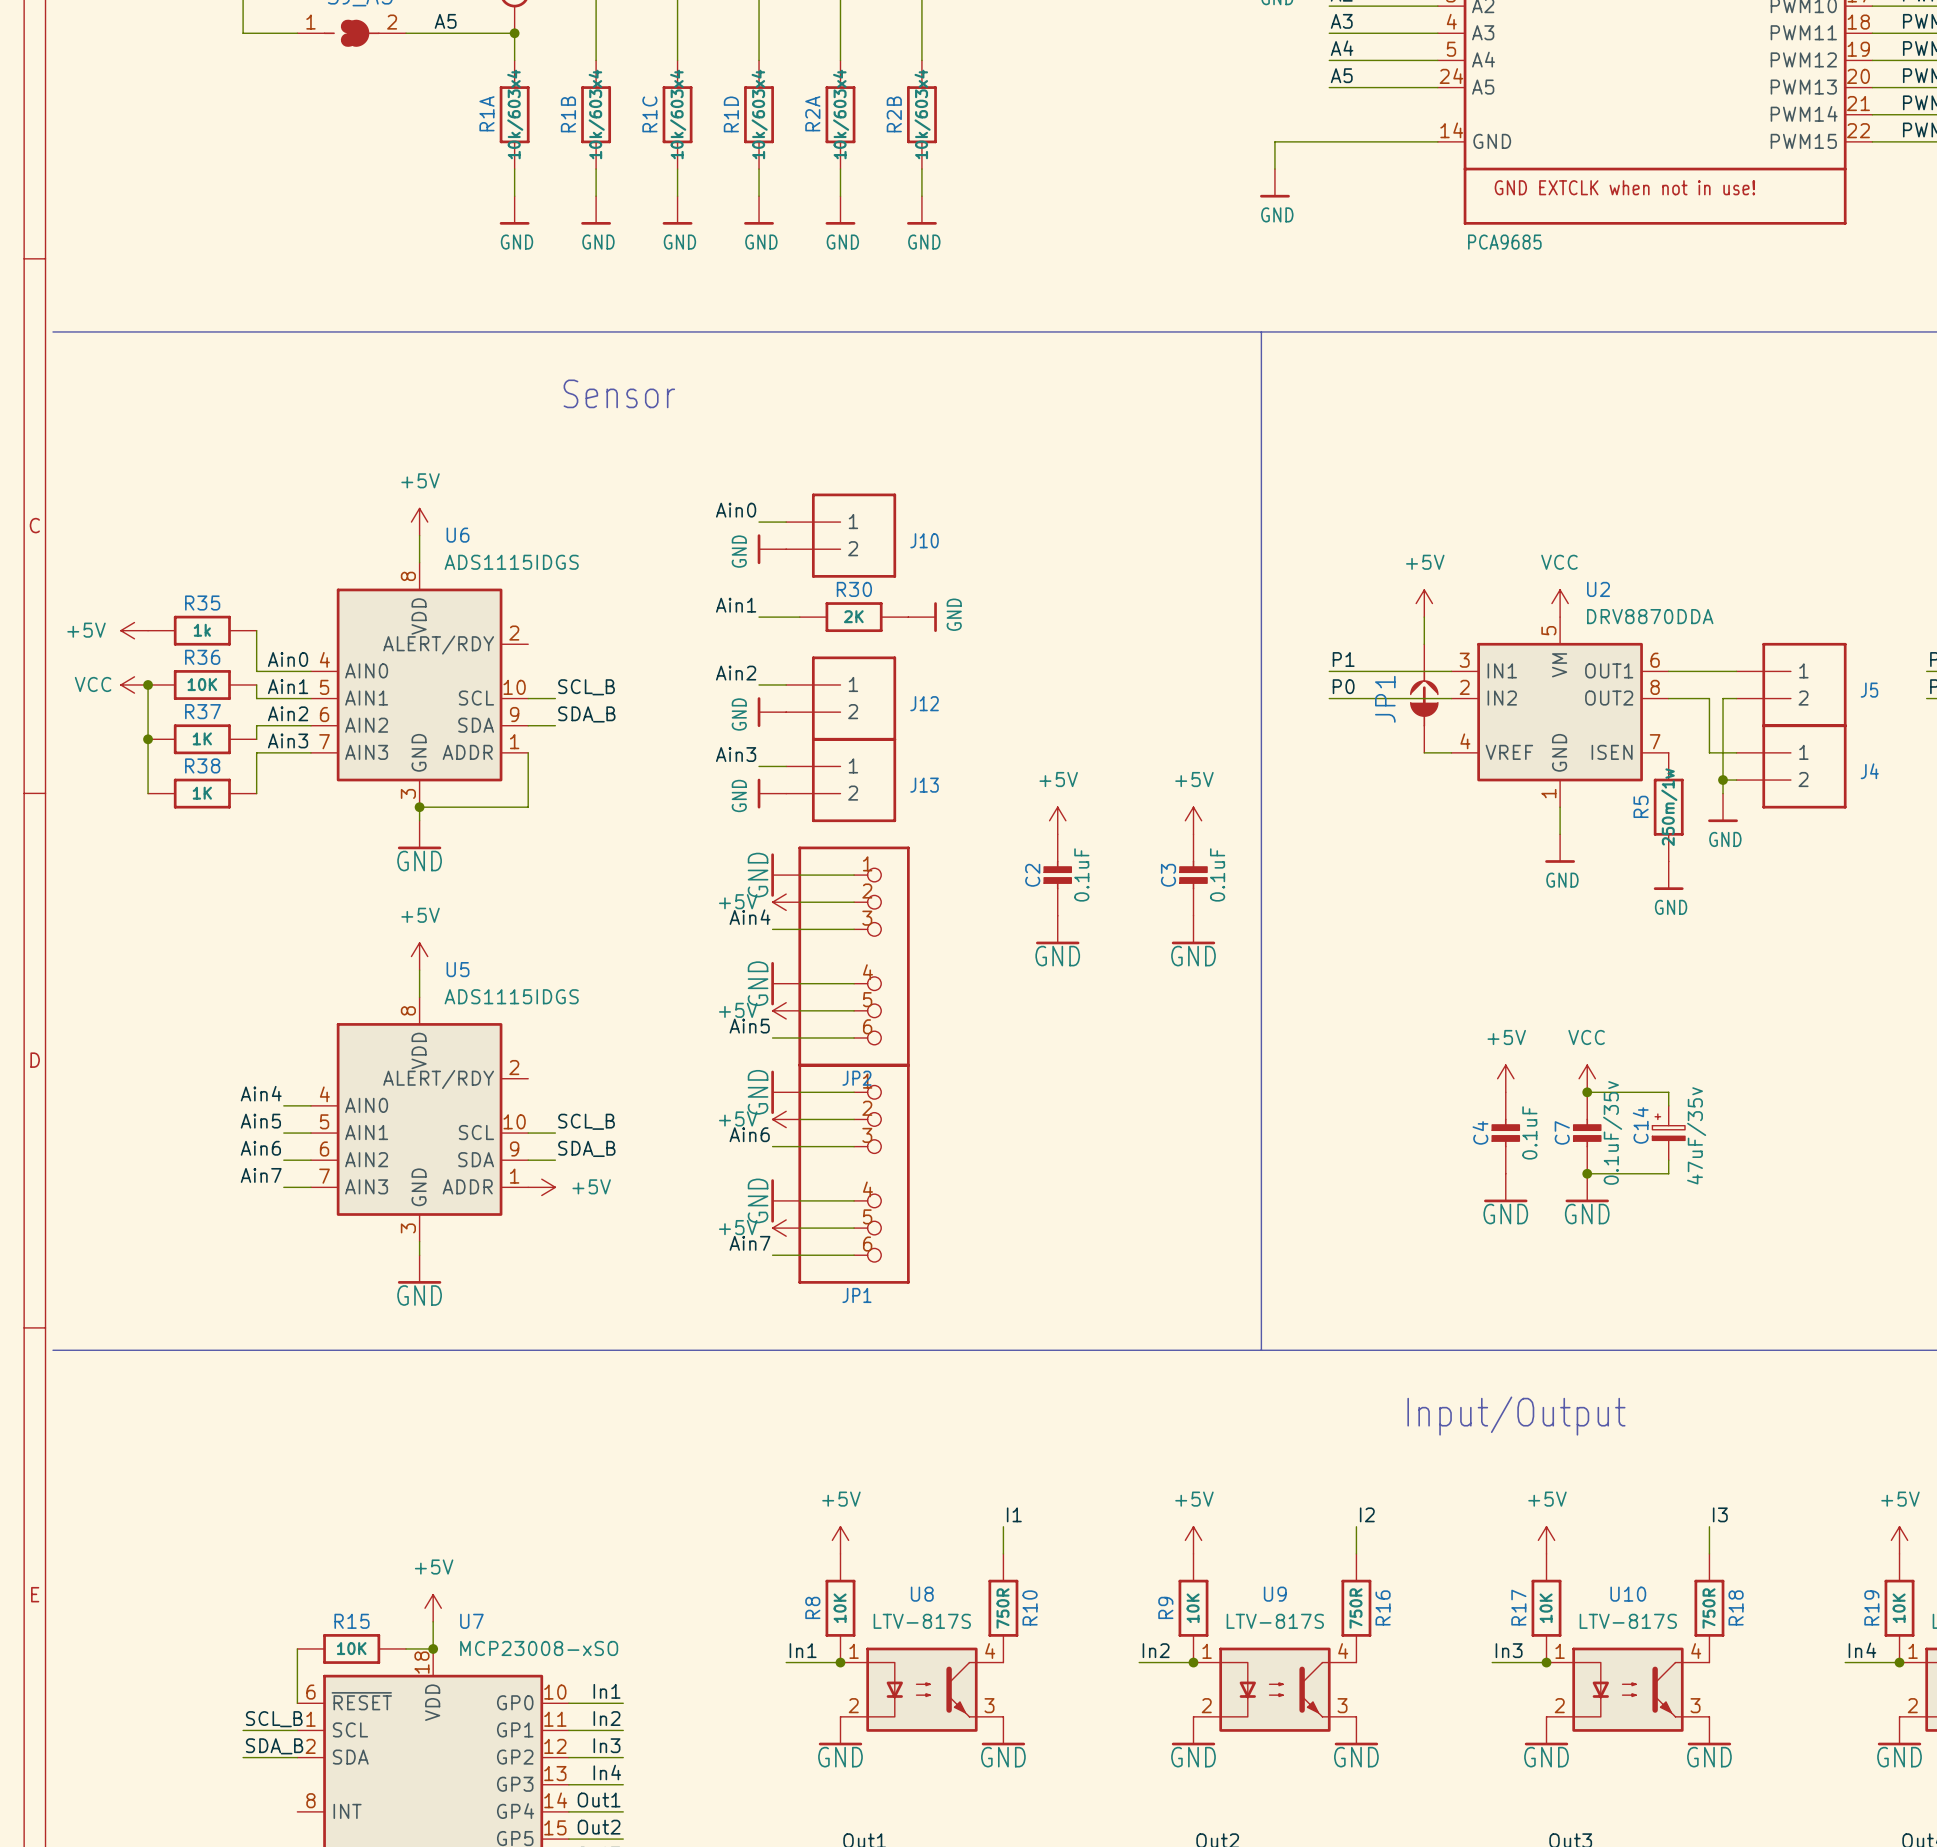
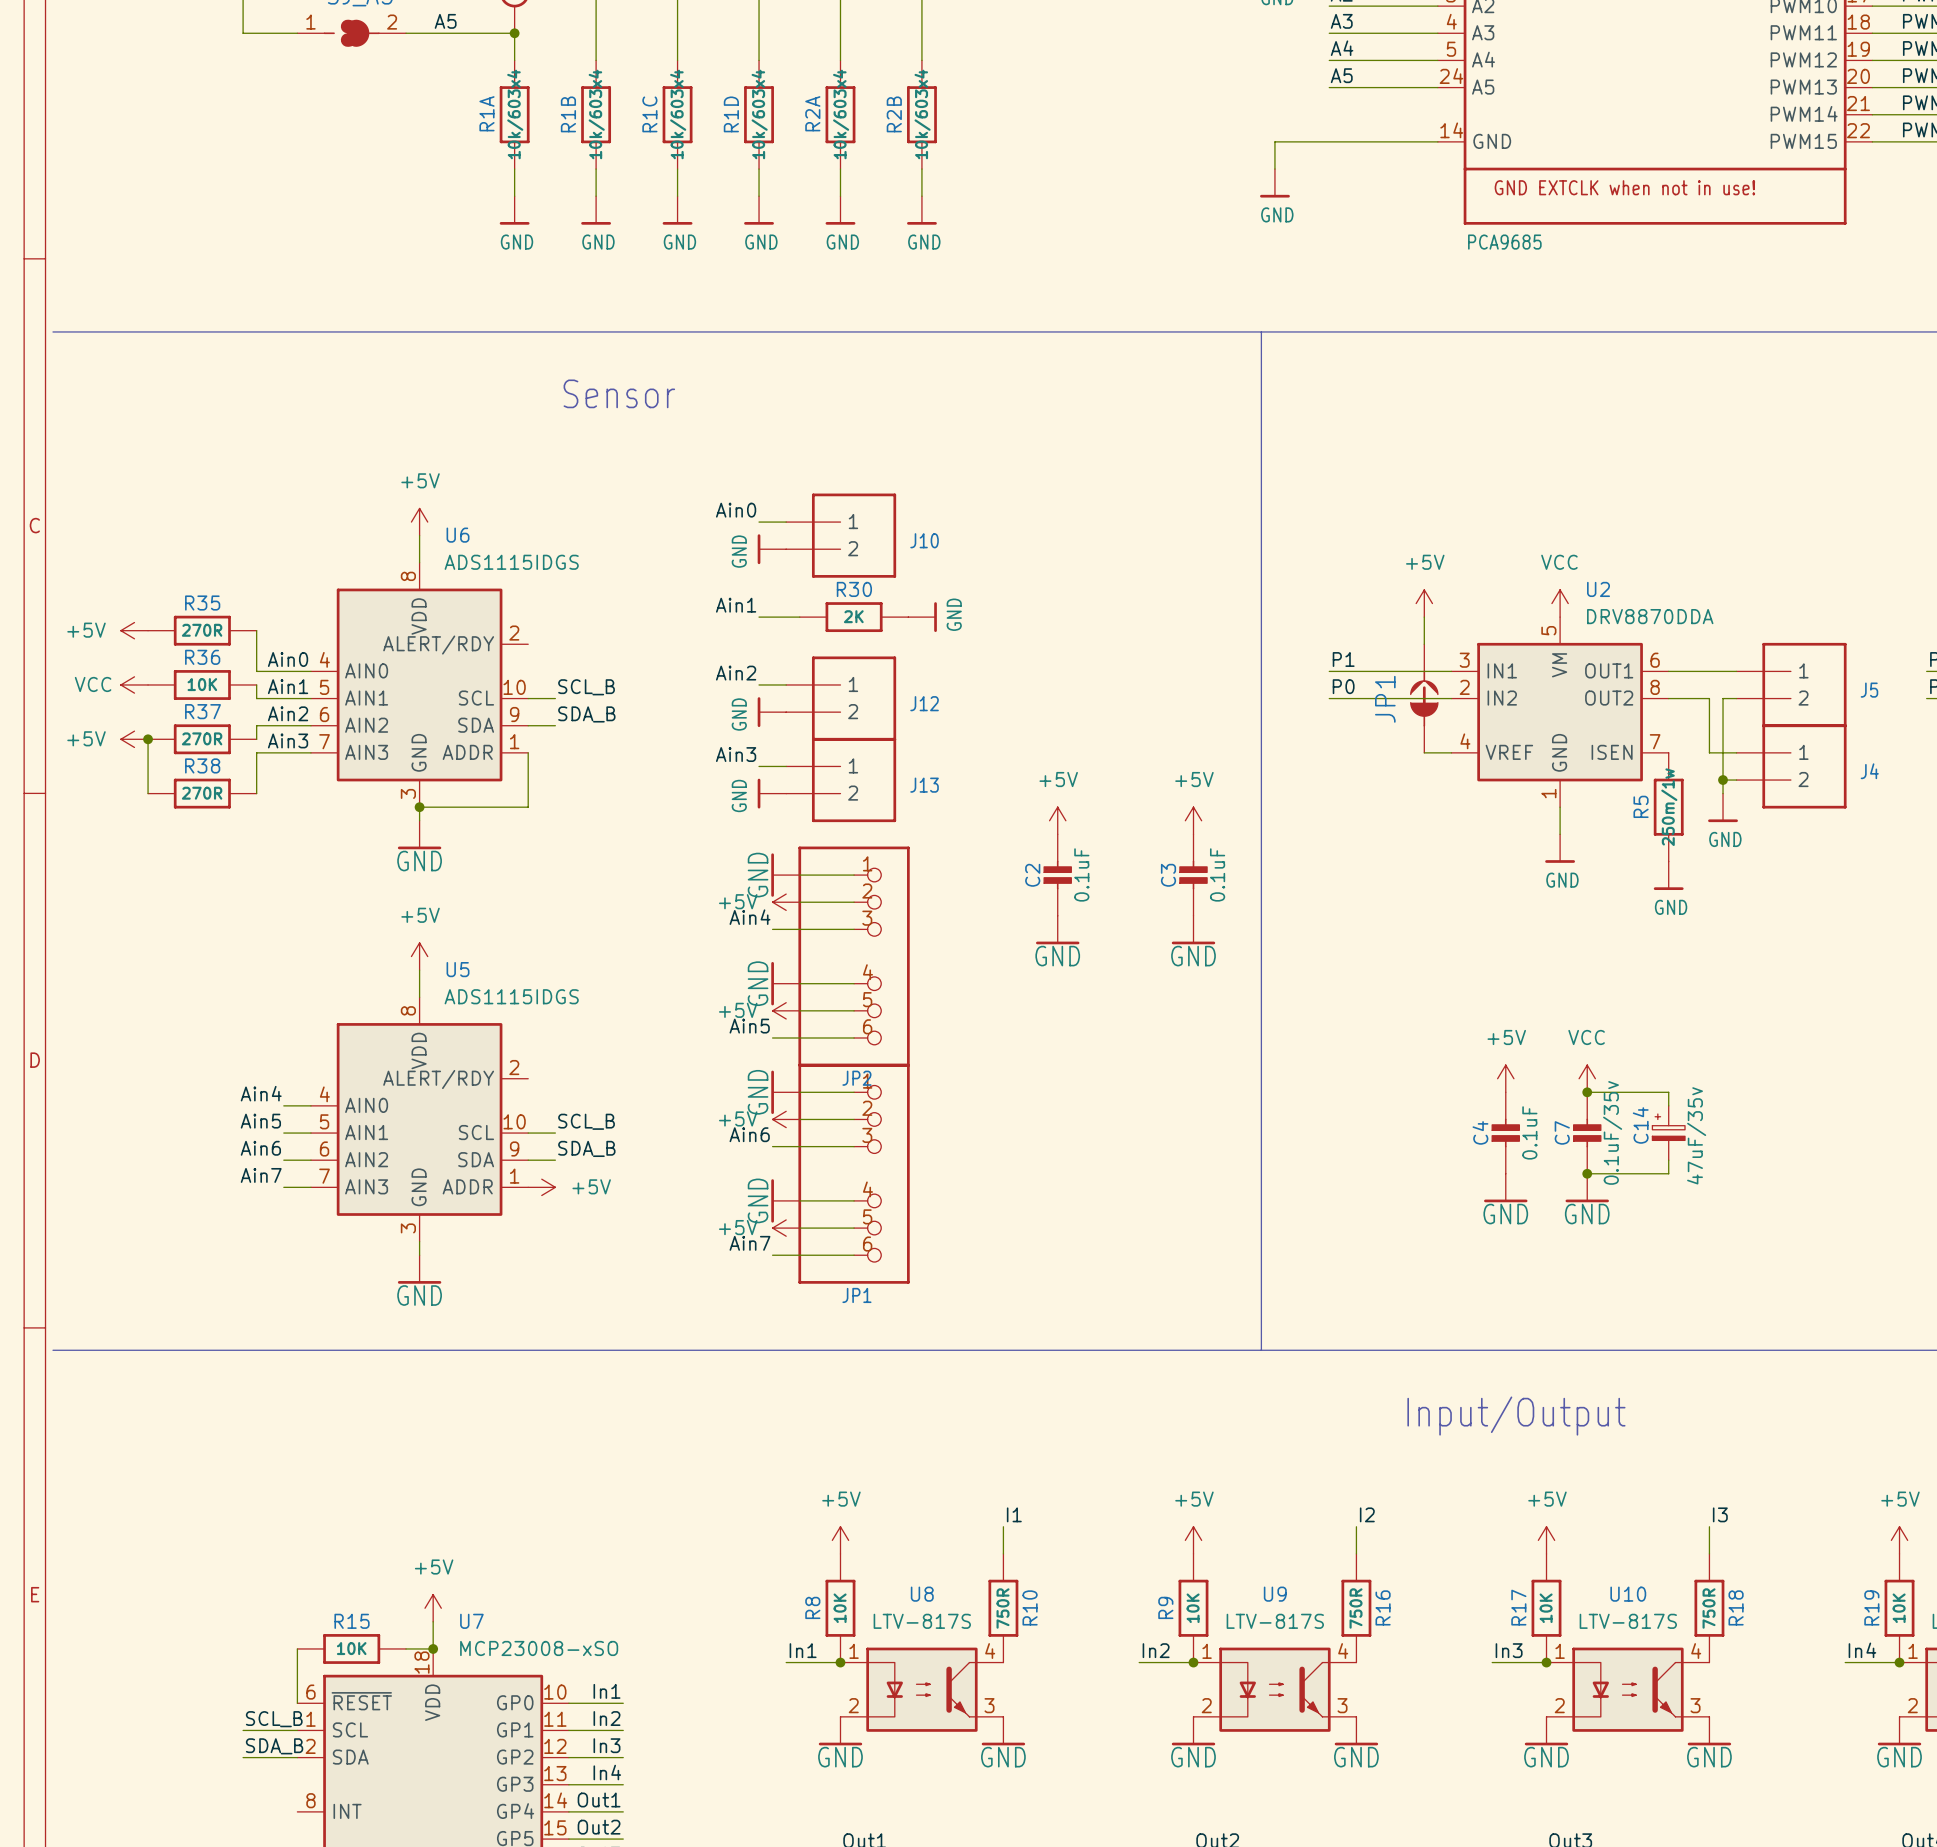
R35 value: 1k (202, 630) -> 270R (202, 630)
wire: (148, 684) (148, 739) -> none
junction: (148, 684) -> none
R37 value: 1K (202, 738) -> 270R (202, 738)
power symbol: none -> +5V (134, 739)
R38 value: 1K (202, 793) -> 270R (202, 793)

